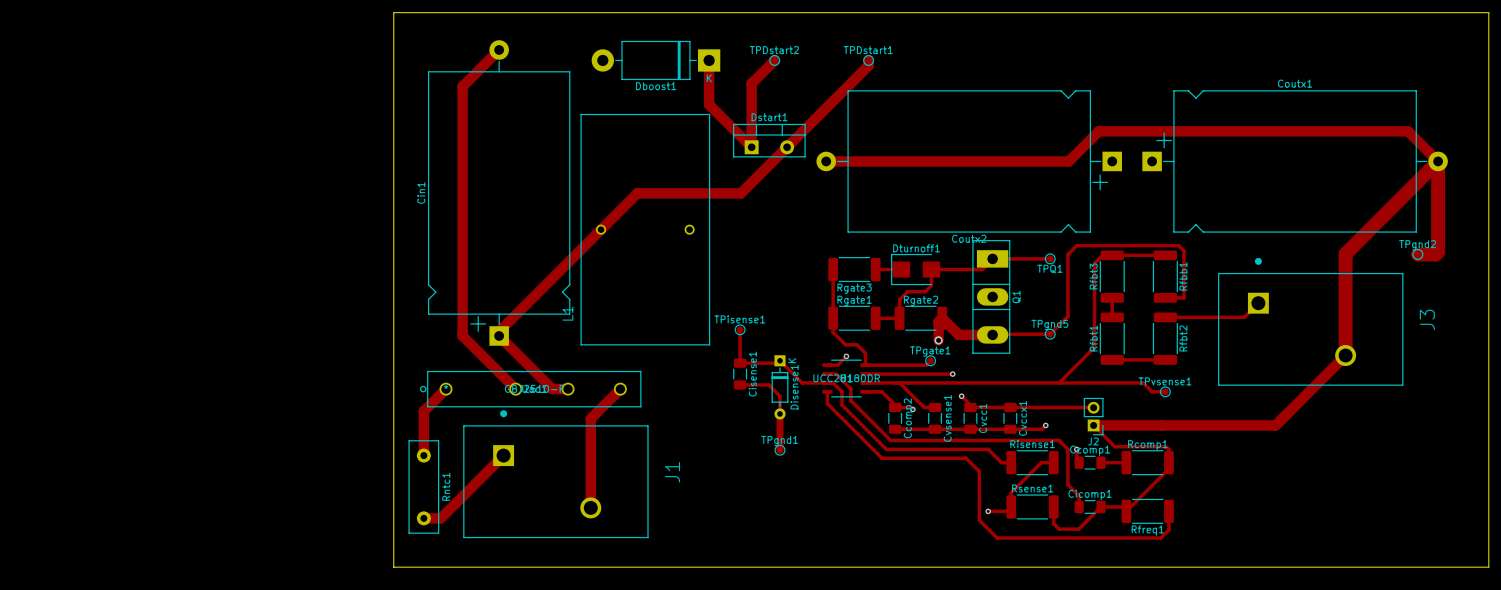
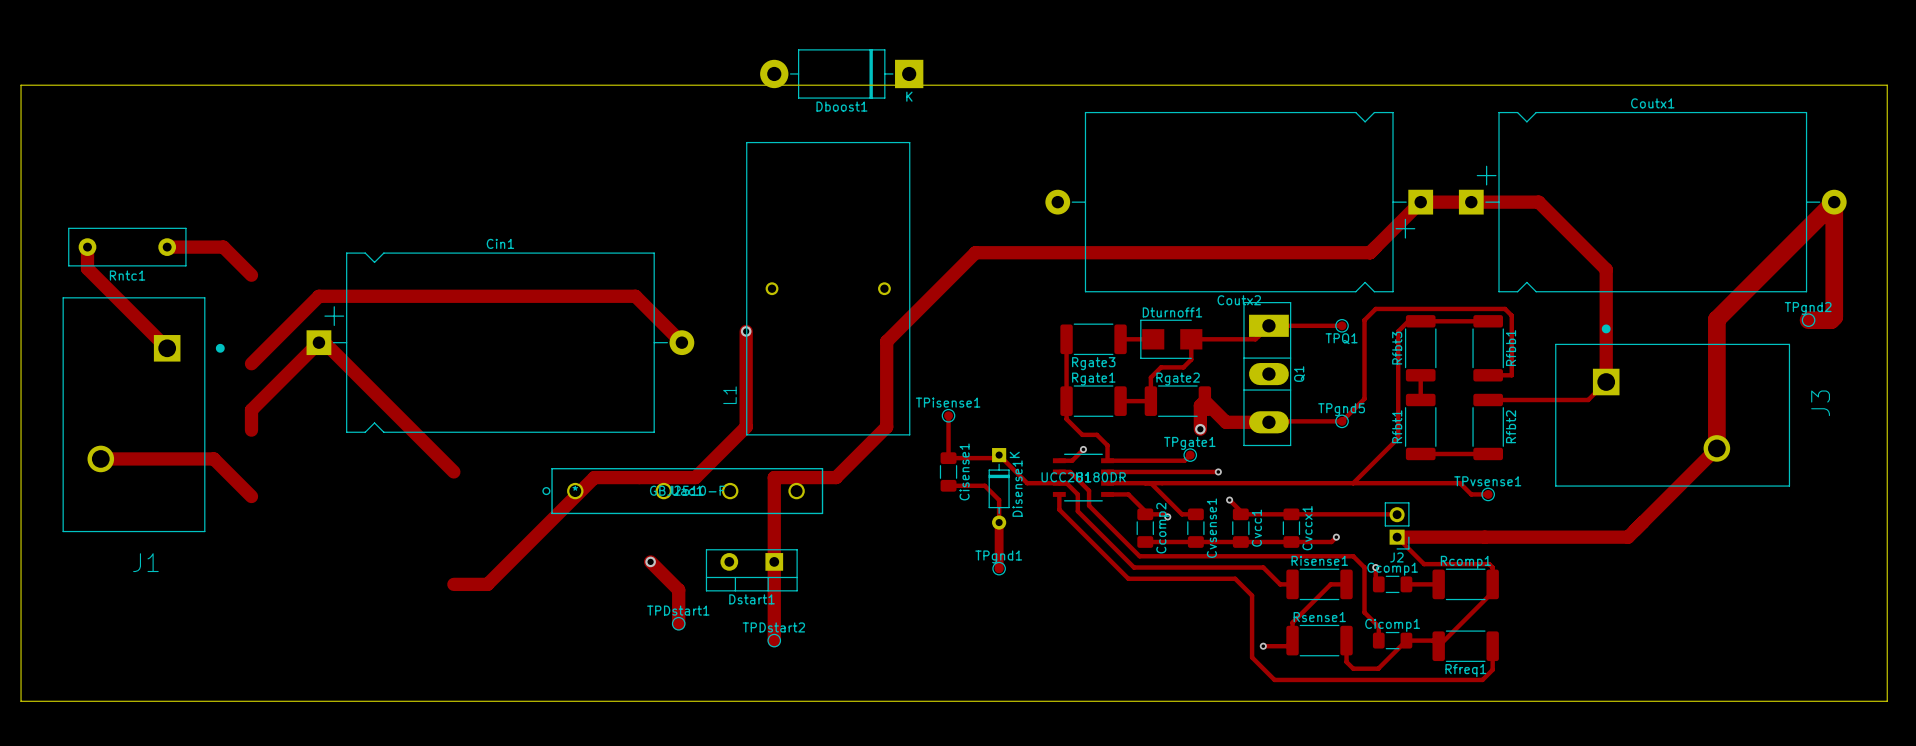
board edge: (393, 12) (393, 567) (1488, 567) (1488, 12) (393, 12) -> (21, 85) (21, 701) (1887, 701) (1887, 85) (21, 85)
track: (499, 49) (462, 86) (462, 335) (515, 389) -> none
track: (709, 60) (709, 104) (751, 147) (751, 83) (774, 60) -> none
TPDstart2 position: (774, 60) -> (774, 640)
track: (868, 60) (868, 65) (741, 193) (637, 193) (499, 331) (499, 335) (552, 389) (568, 389) -> none
TPDstart1 position: (868, 60) -> (678, 623)
Dstart1 rotation: 0° (769, 140) -> 180° (751, 570)
Dstart1 position: (769, 140) -> (751, 570)
track: (826, 161) (1068, 161) (1098, 131) (1407, 131) (1438, 161) -> none
Cin1 rotation: 0° (499, 192) -> 90° clockwise (500, 342)
track: none -> (87, 247) (87, 268) (167, 348)
track: none -> (167, 247) (223, 247) (251, 275)
track: none -> (746, 331) (746, 426) (695, 477) (594, 477) (487, 584) (453, 584)
via: none -> (746, 331)
track: none -> (681, 342) (635, 296) (318, 296) (251, 363)
track: none -> (1606, 382) (1606, 269) (1538, 202) (1420, 202) (1370, 252) (975, 252) (886, 341) (886, 426) (836, 477) (774, 477) (774, 640)
track: none -> (251, 430) (251, 410) (318, 342) (324, 342) (453, 471)
track: none -> (100, 458) (213, 458) (251, 496)
track: (446, 389) (423, 411) (423, 455) -> none
track: (620, 389) (590, 418) (590, 507) -> none
track: none -> (650, 561) (678, 590) (678, 623)
via: none -> (650, 561)
track: (503, 455) (440, 518) (423, 518) -> none
J1 rotation: 0° (555, 474) -> 90° clockwise (143, 414)
J1 position: (555, 474) -> (143, 414)
Rntc1 rotation: 0° (423, 486) -> 90° clockwise (127, 247)
Rntc1 position: (423, 486) -> (127, 247)

